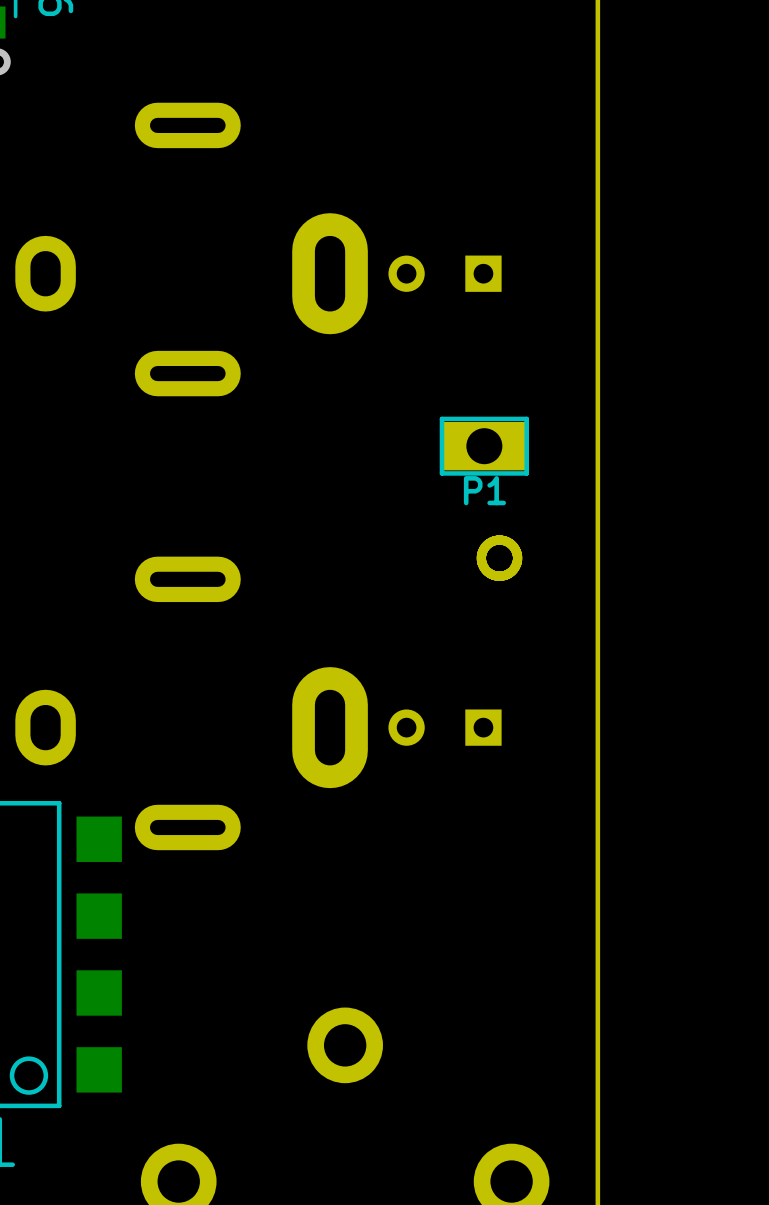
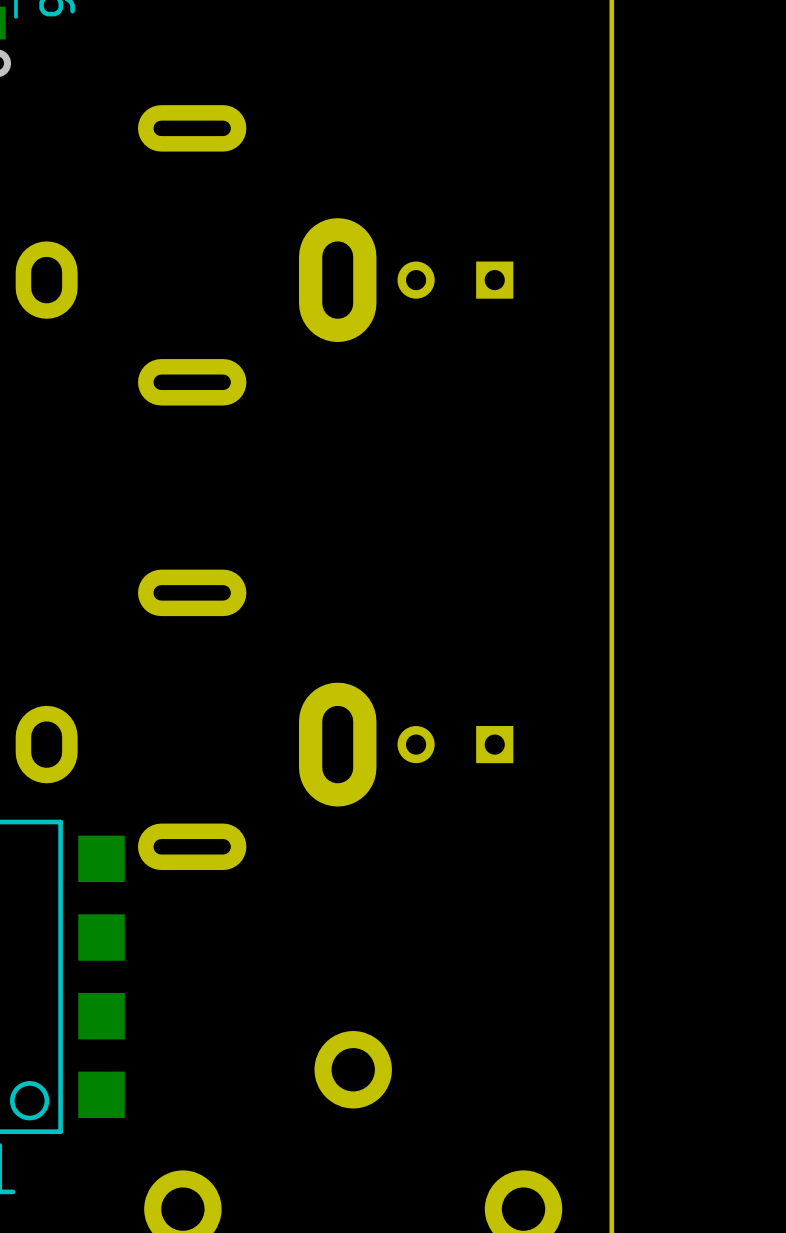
P1: (484, 446) -> none
part: (499, 558) -> none

